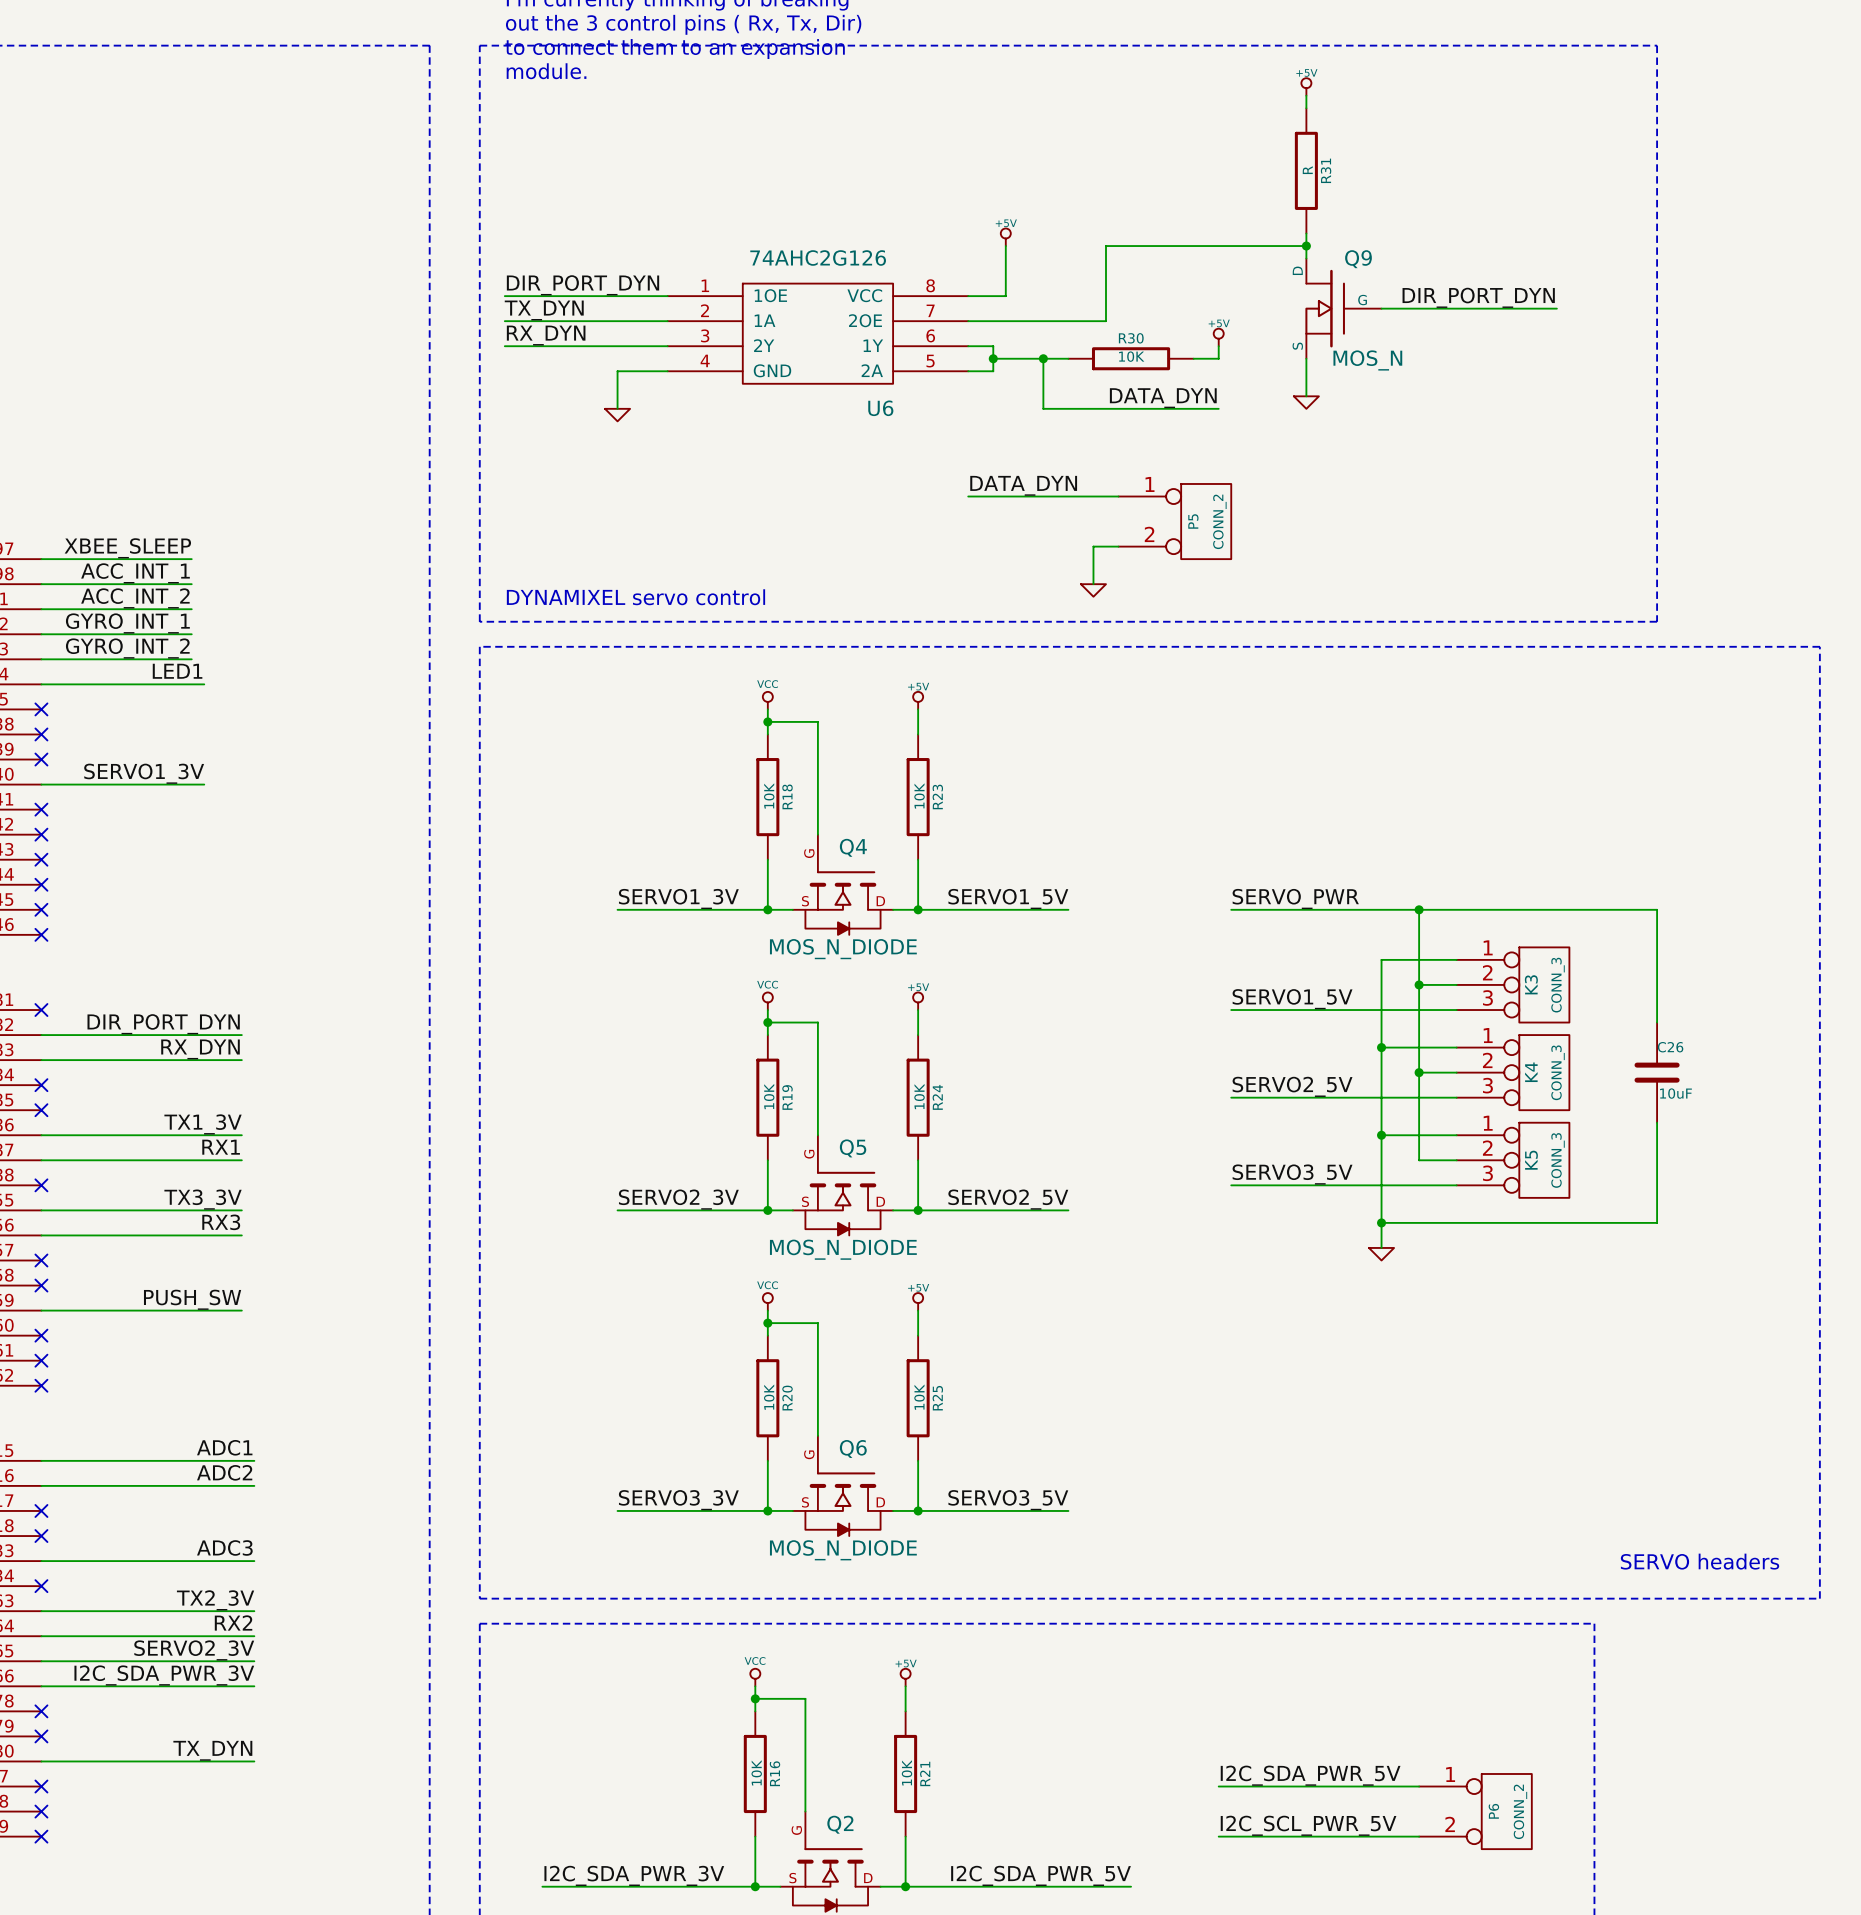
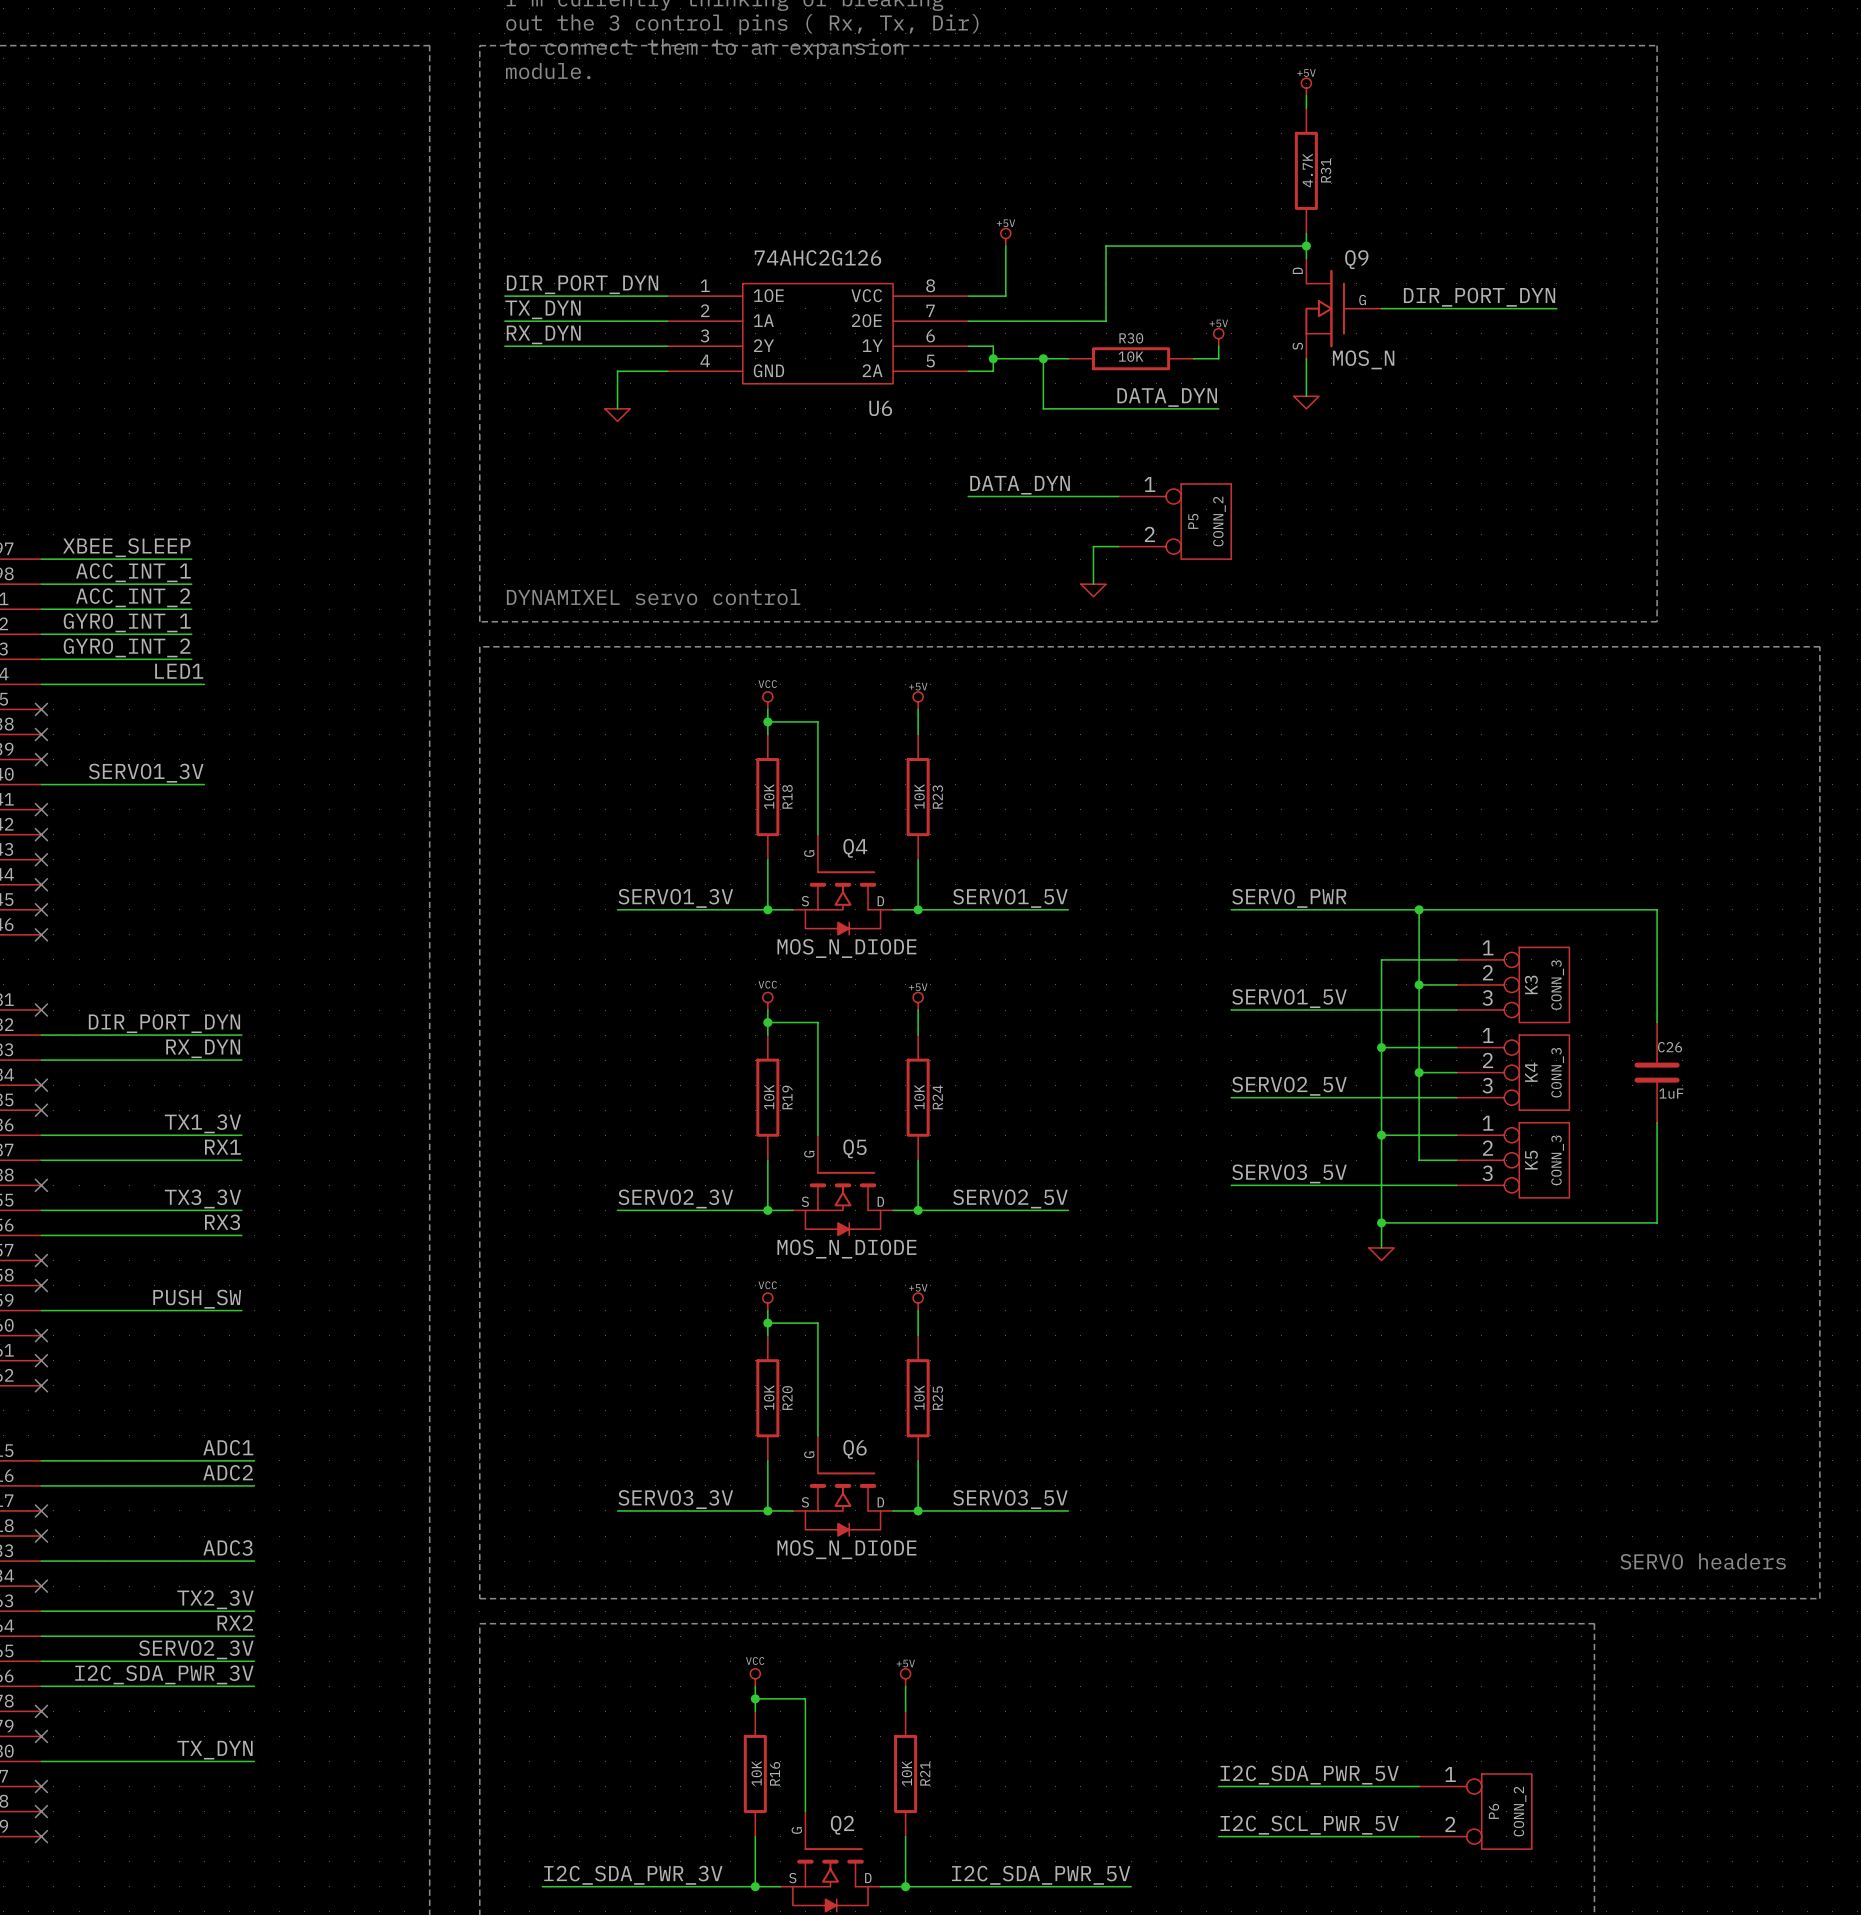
R31 value: R (1307, 170) -> 4.7K (1307, 170)
C26 value: 10uF (1675, 1093) -> 1uF (1671, 1093)

